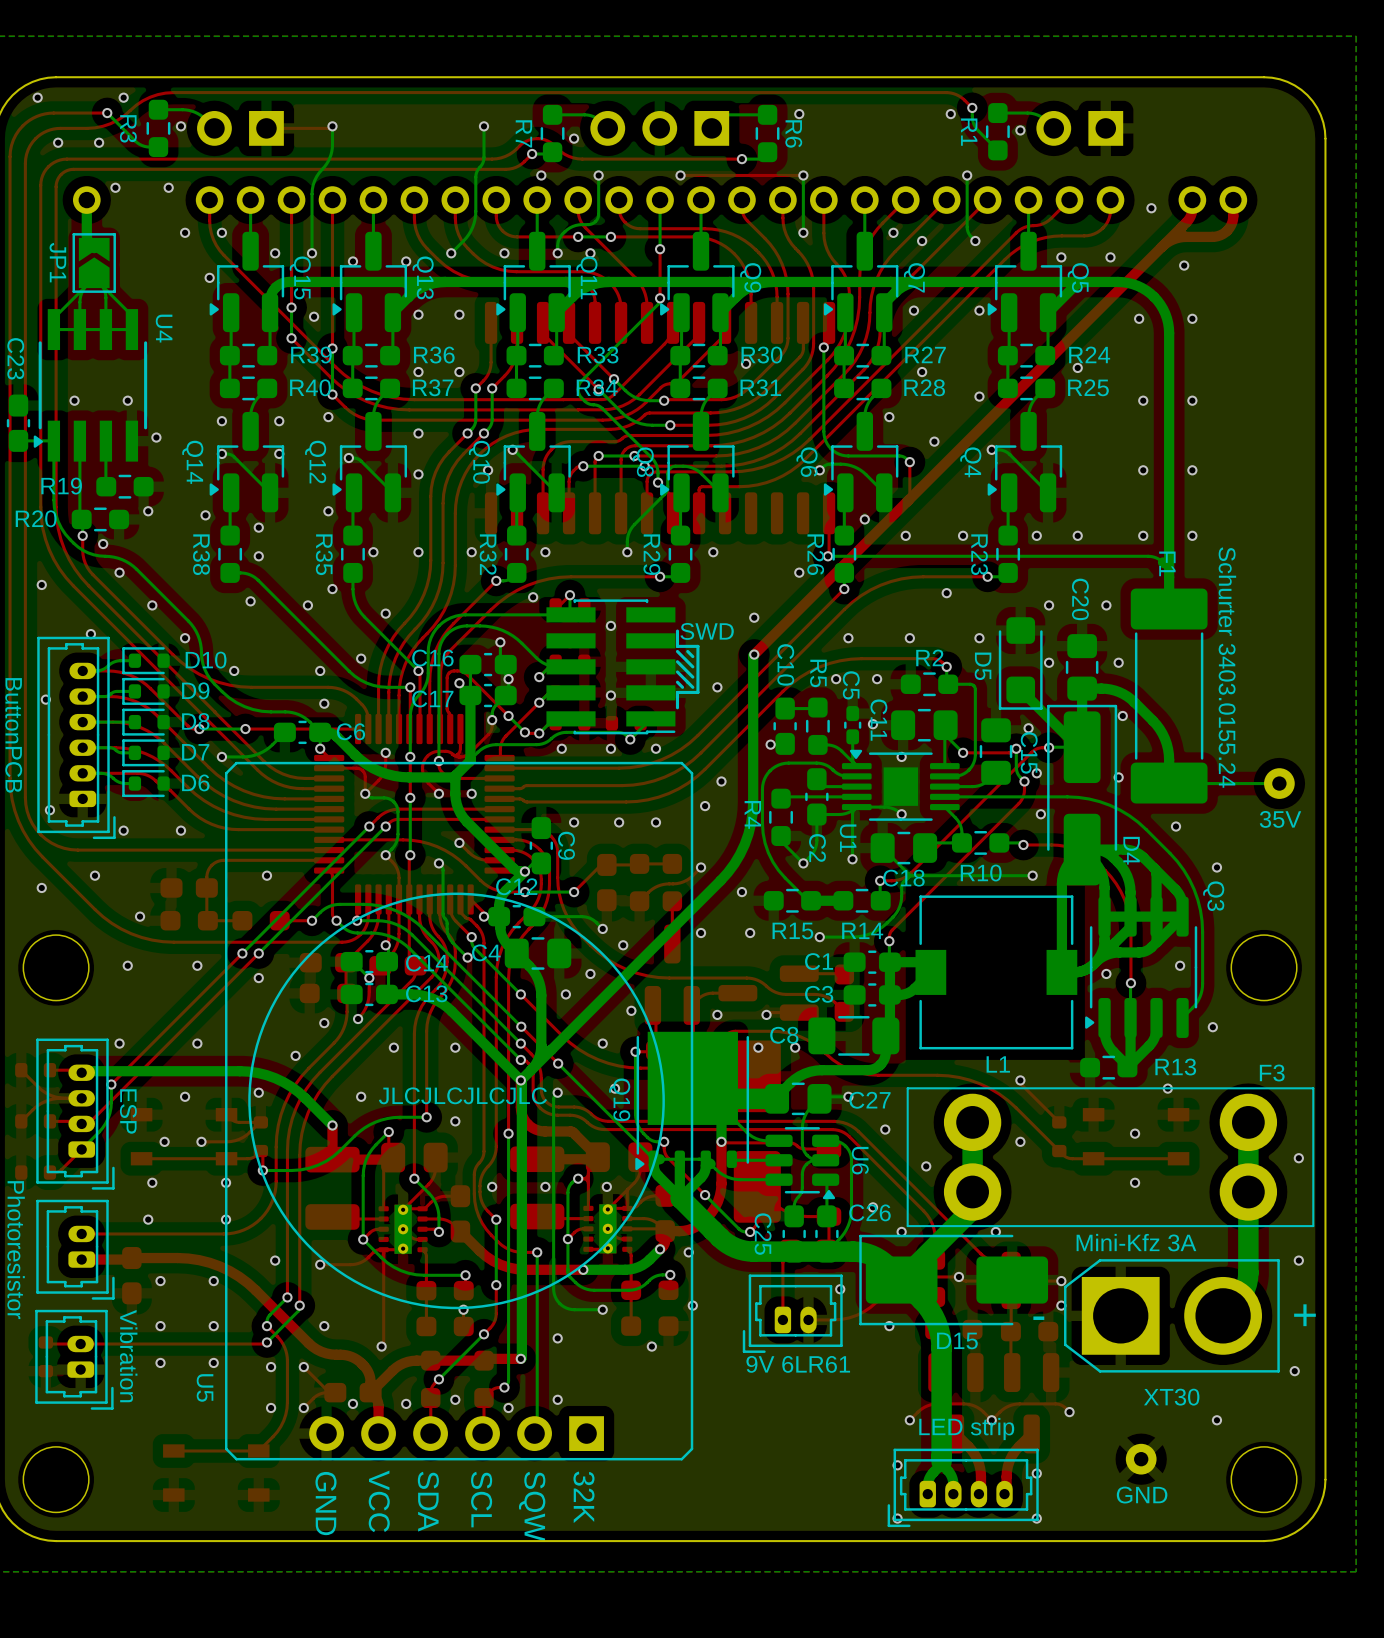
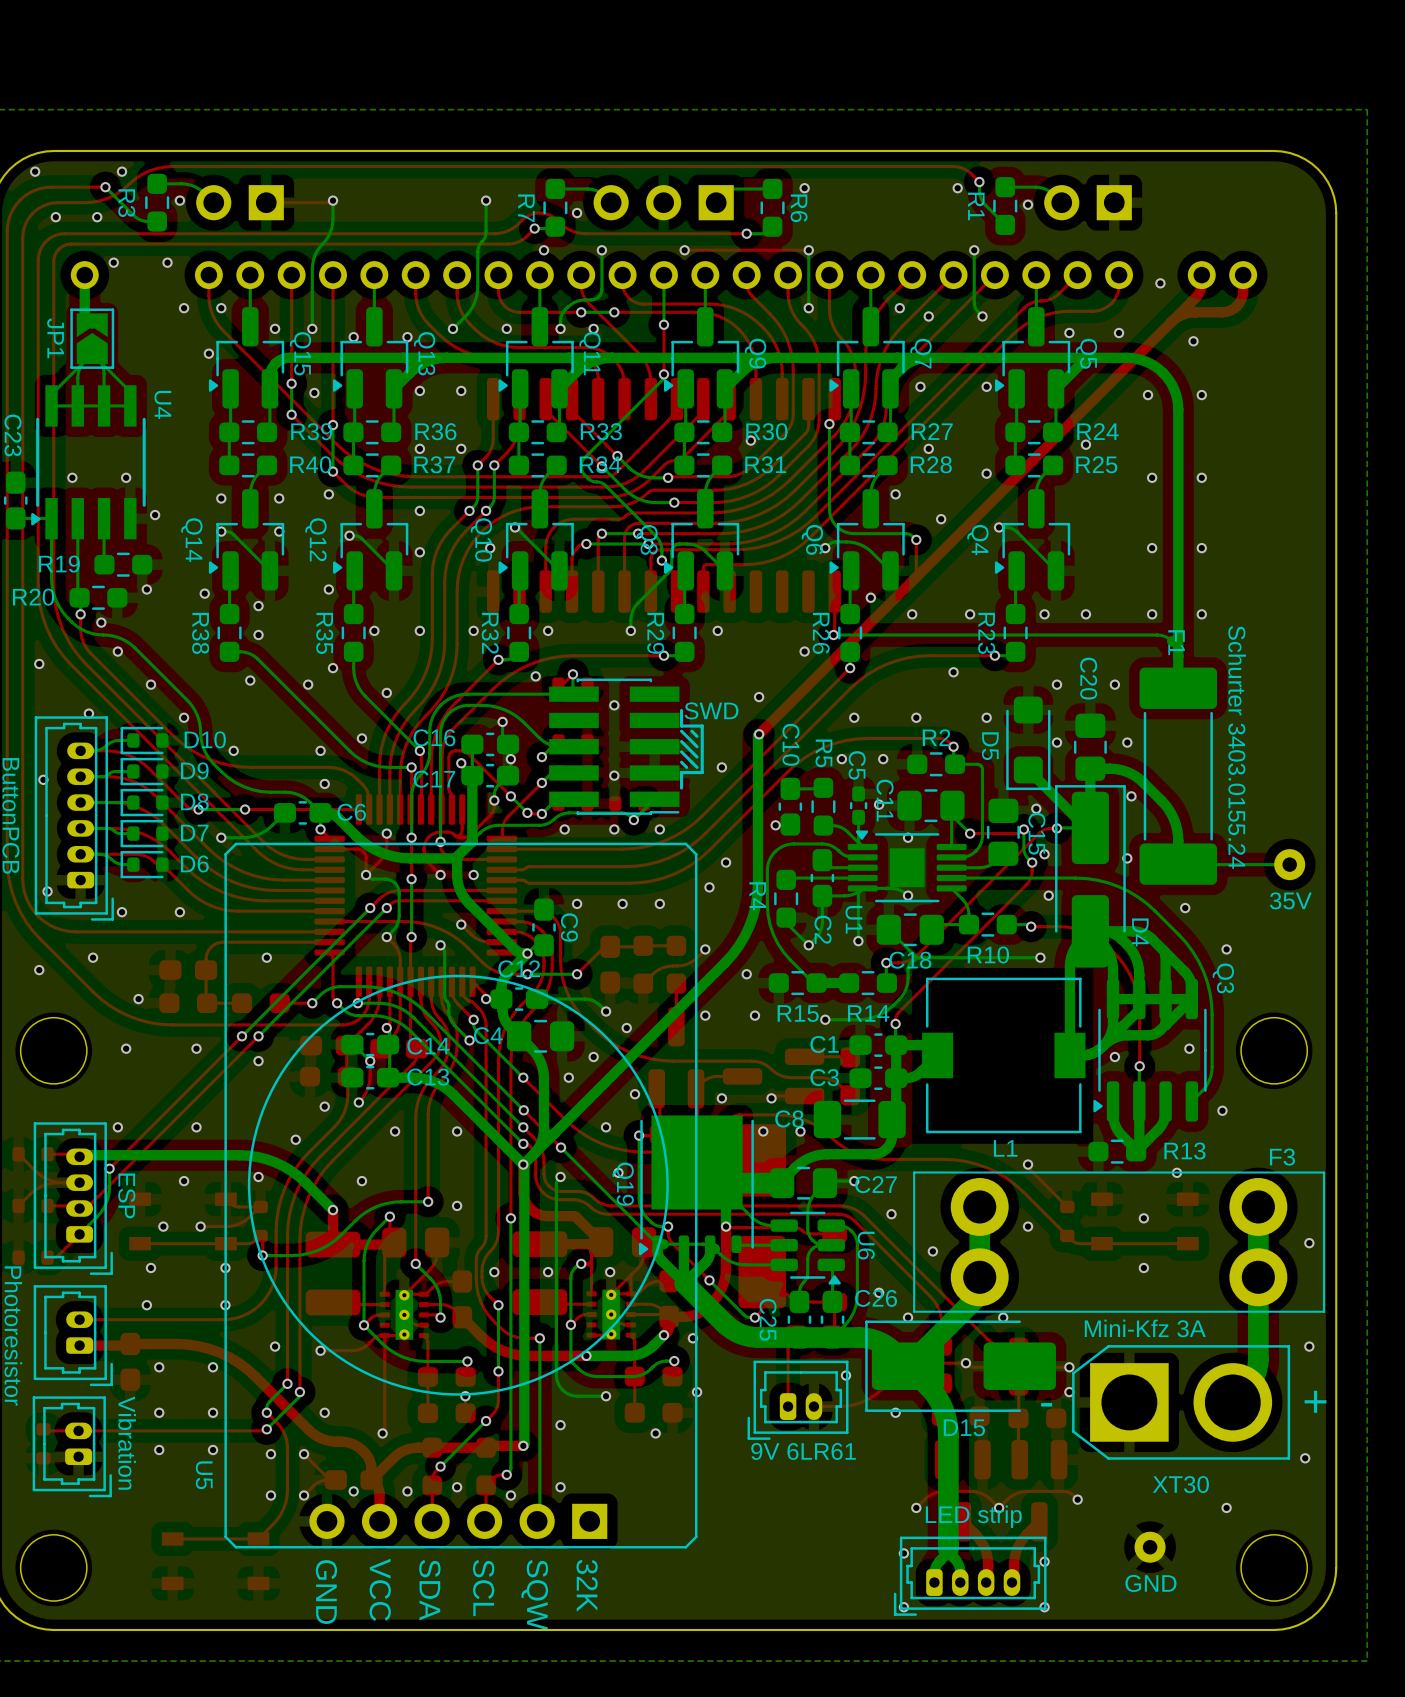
text: JLCJLCJLCJLC (462, 1095) -> none

